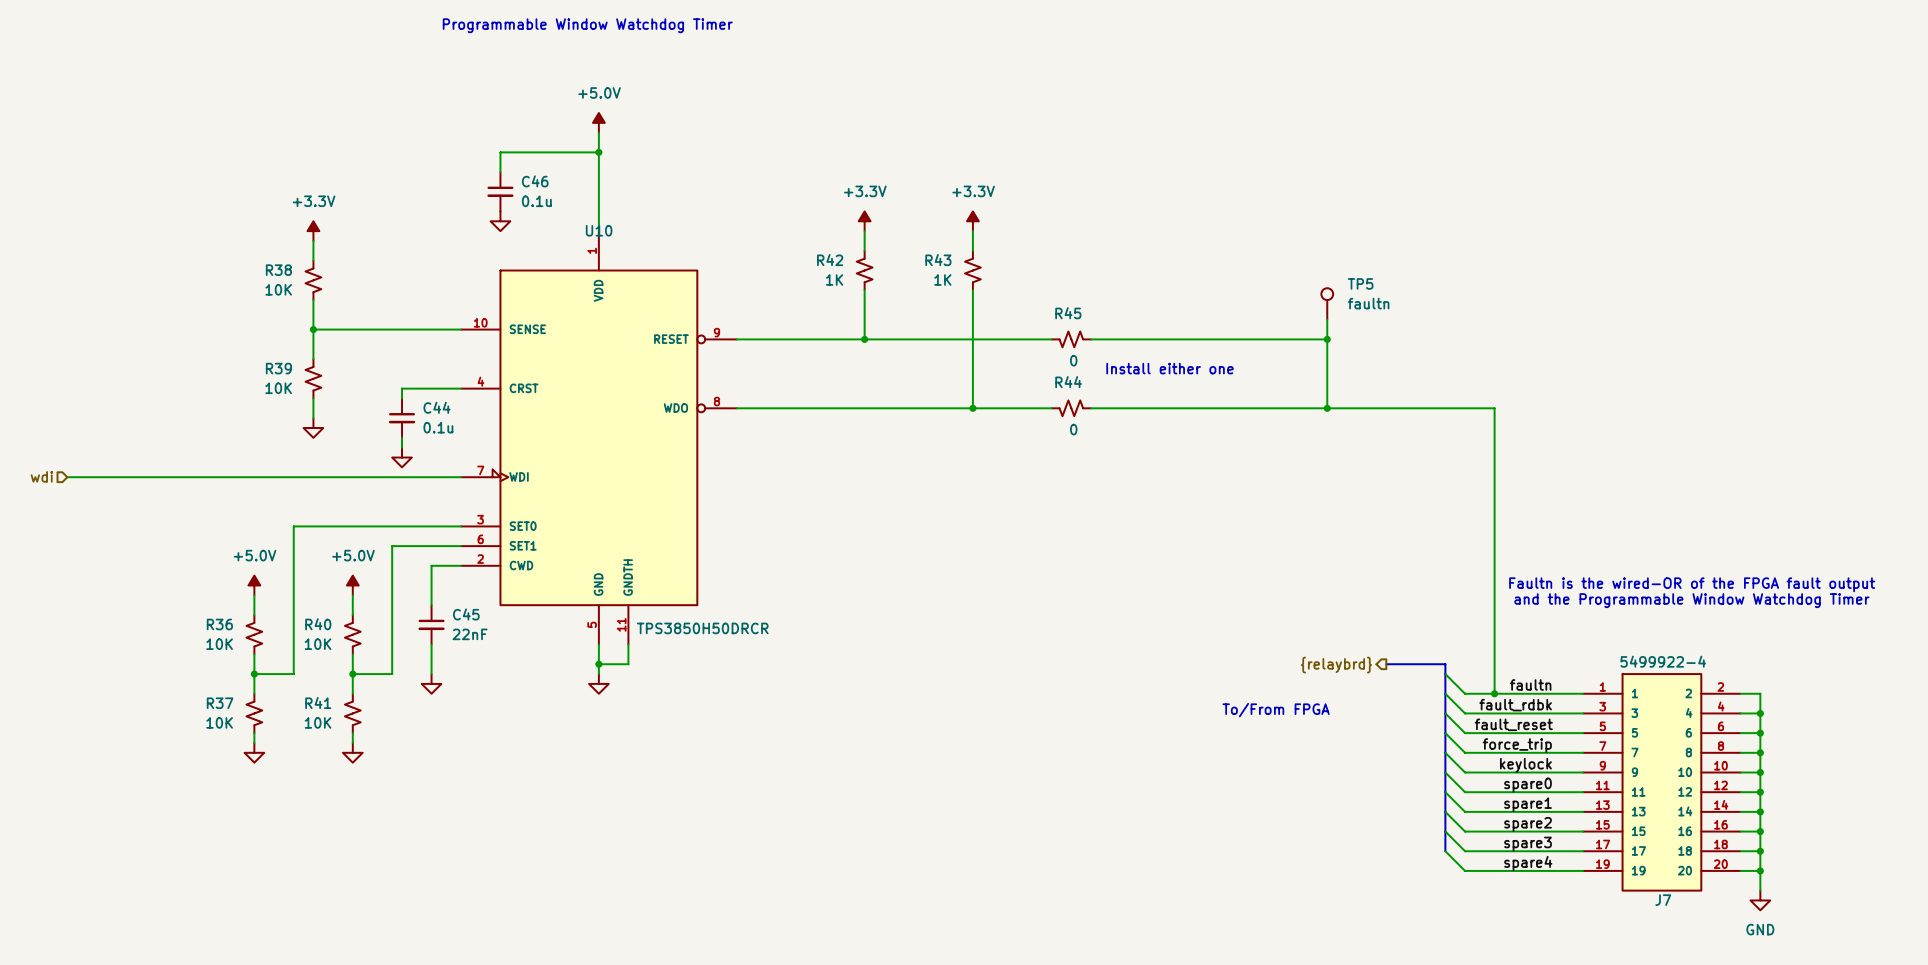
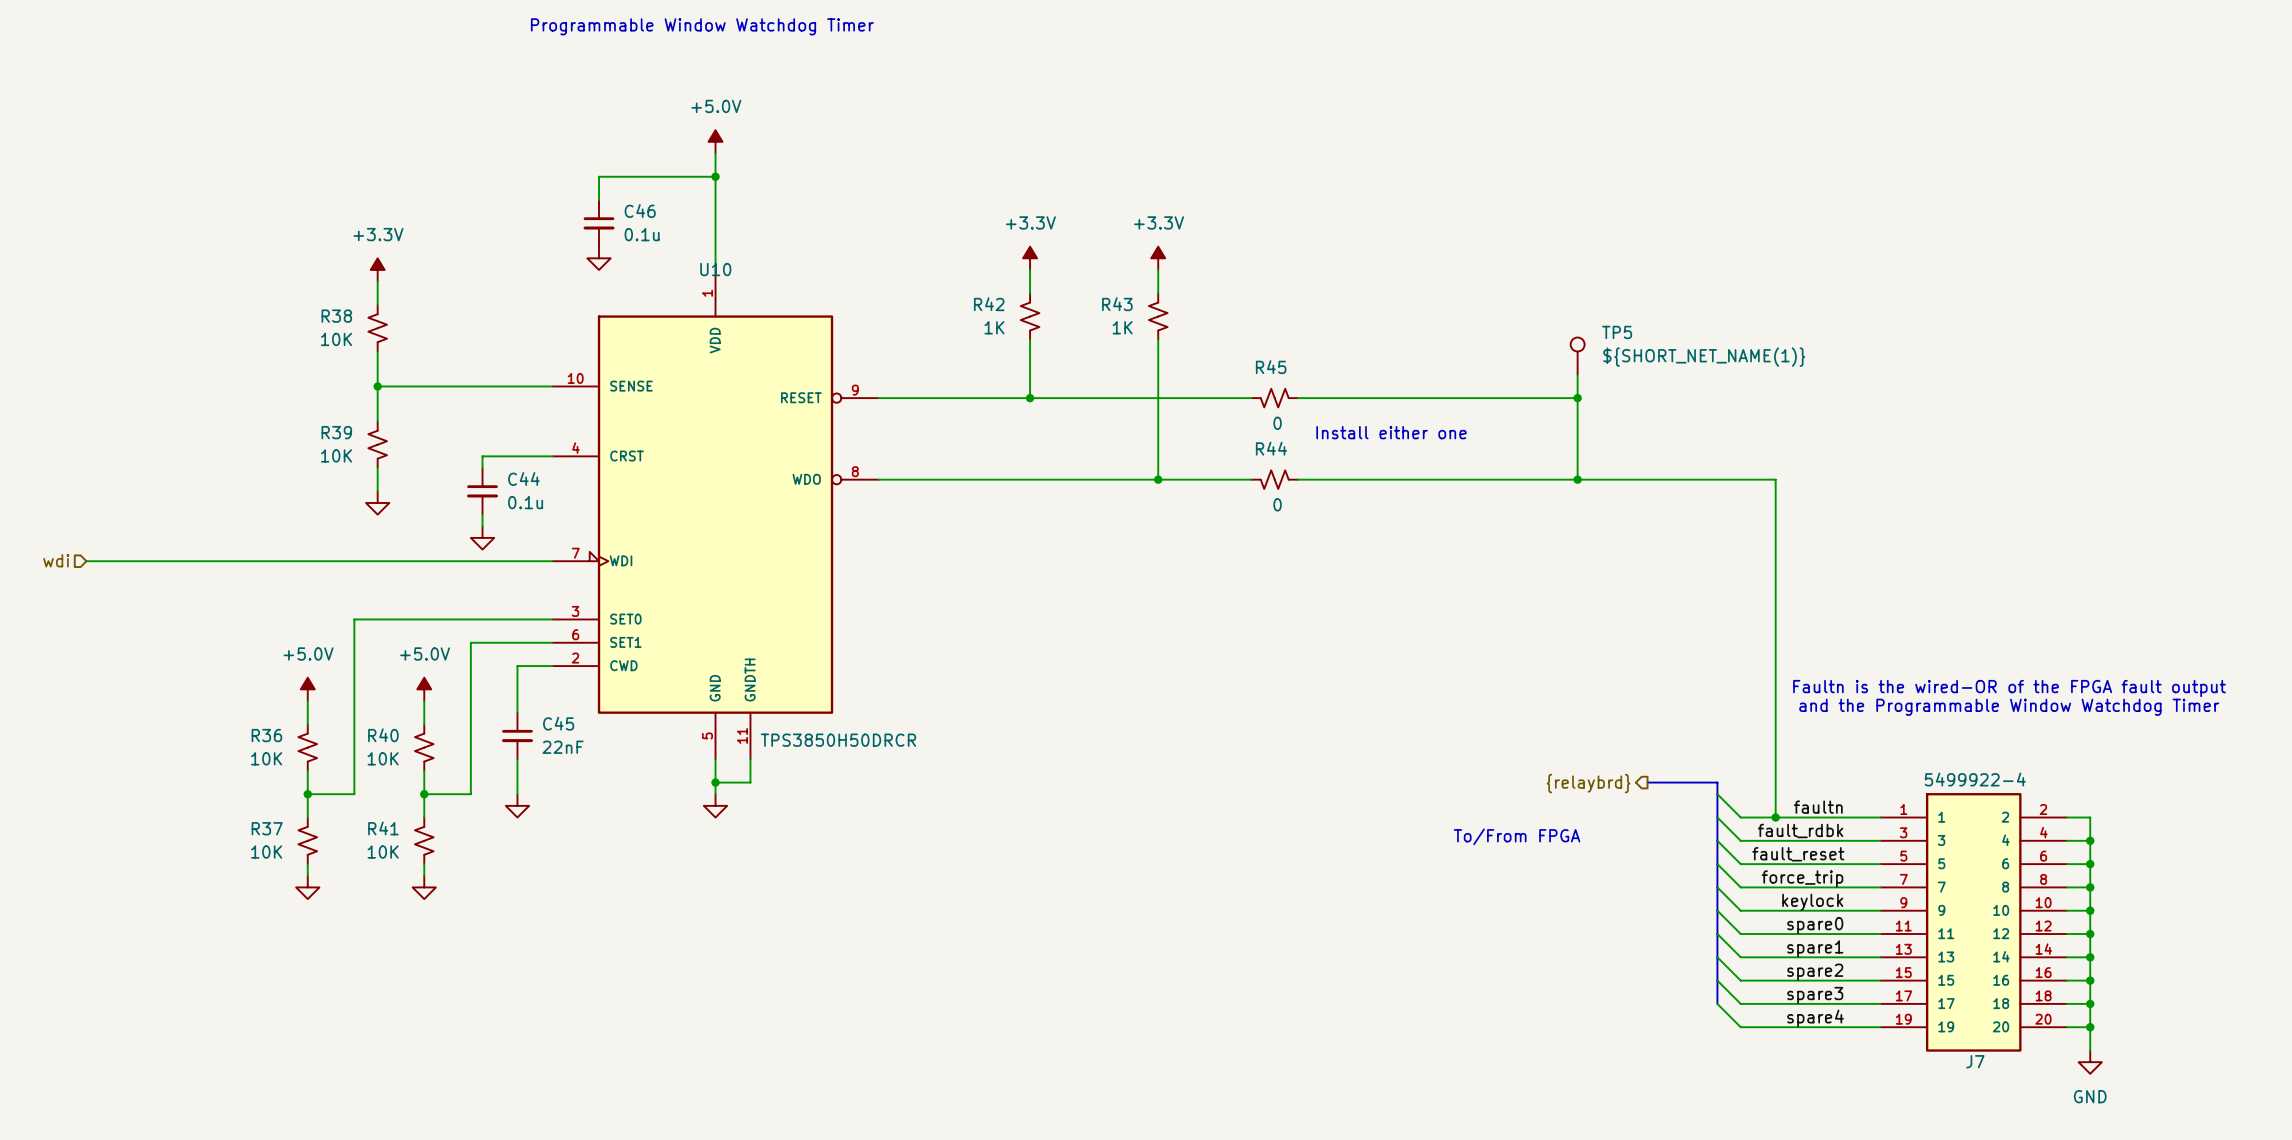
TP5 value: faultn (1368, 303) -> ${SHORT_NET_NAME(1)} (1704, 357)

